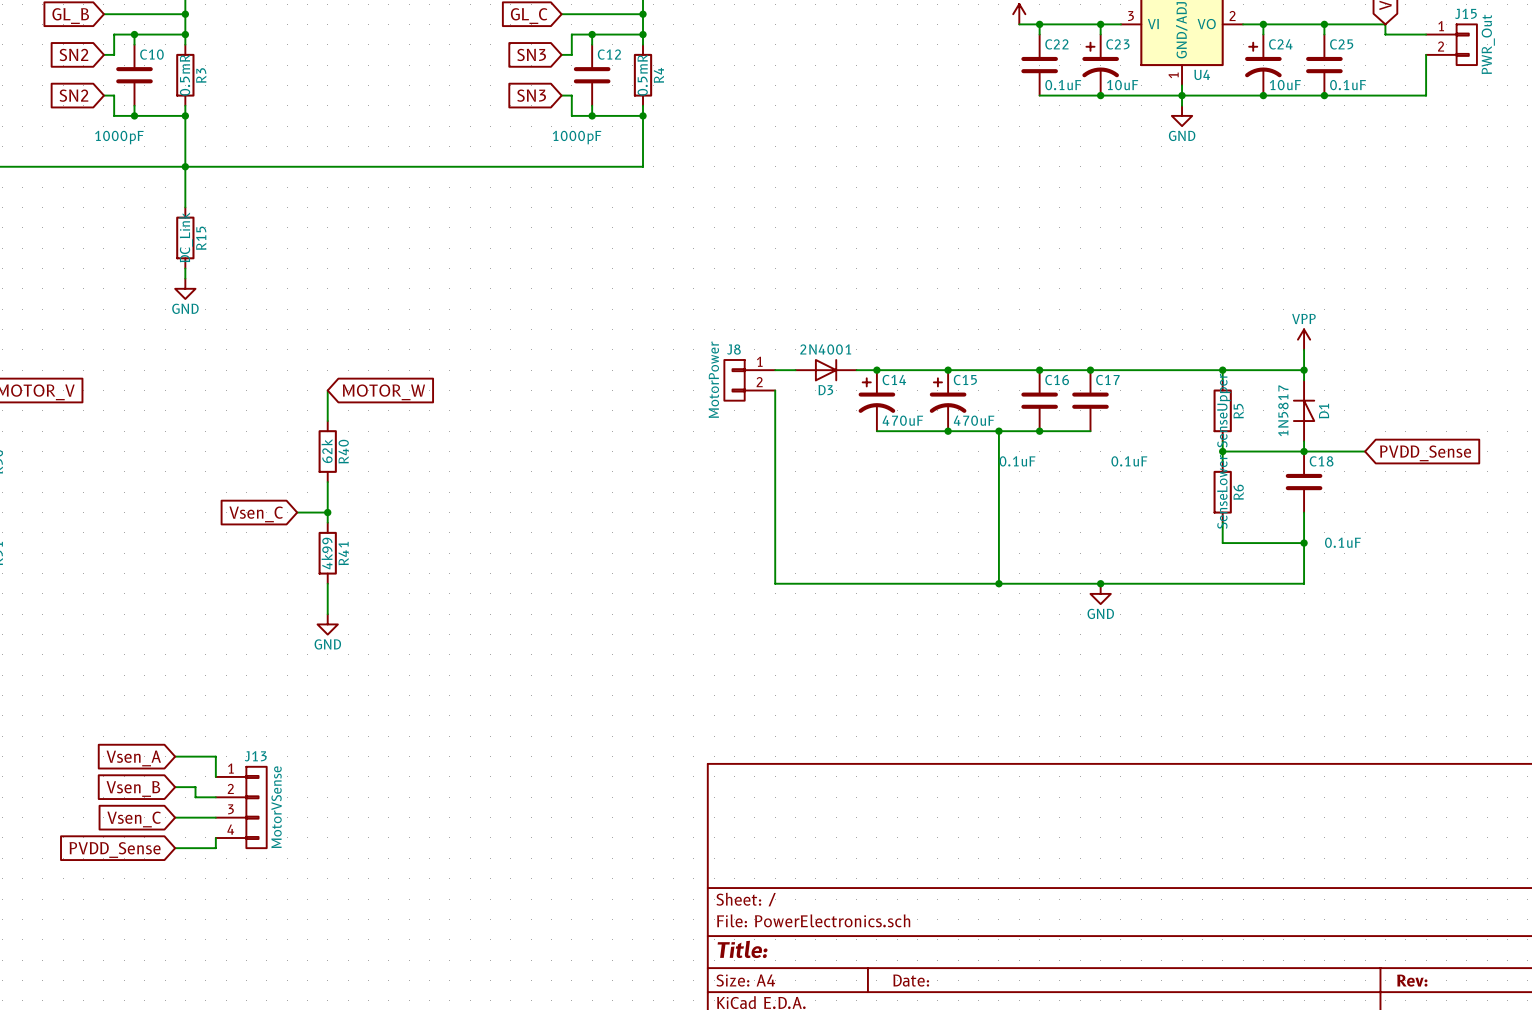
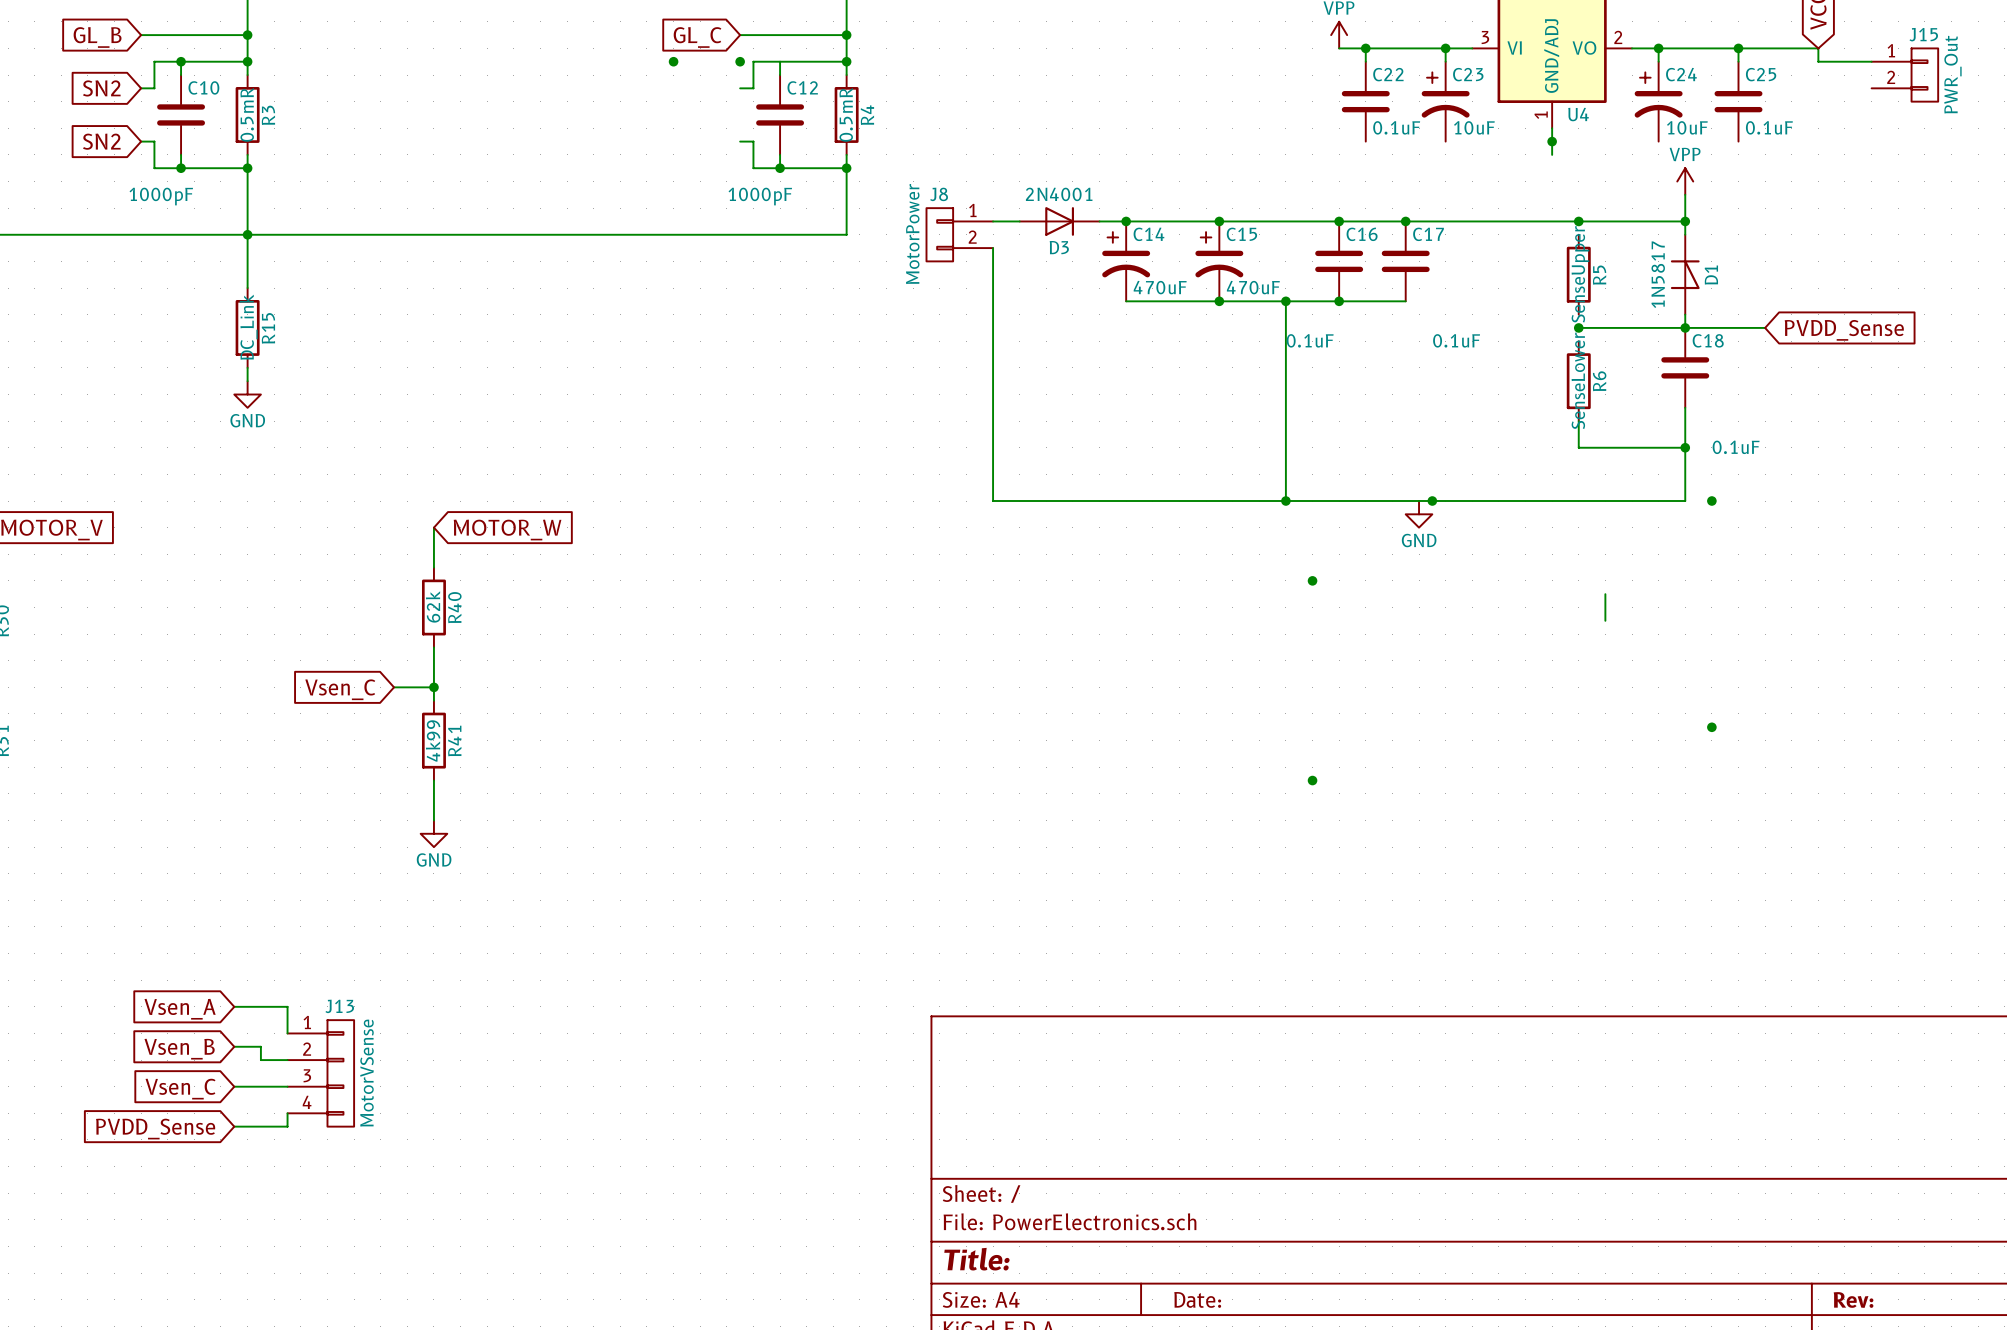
junction: none -> (673, 61)
junction position: (592, 34) -> (740, 61)
global label: SN3 (531, 54) -> none
wire: (1426, 54) (1426, 95) (1039, 95) -> none
global label: SN3 (531, 95) -> none
junction: (1100, 95) -> none
junction: (1263, 95) -> none
junction: (1324, 95) -> none
power symbol: GND (1182, 115) -> none
power symbol: none -> VPP (1685, 181)
wire: none -> (1685, 194) (1685, 234)
wire: none -> (993, 221) (1019, 221)
wire: none -> (1099, 221) (1685, 221)
junction: none -> (1126, 221)
junction: none -> (1219, 221)
junction: none -> (1339, 221)
junction: none -> (1405, 221)
junction: none -> (1578, 221)
junction: none -> (1685, 221)
wire: none -> (993, 248) (993, 501) (1019, 501)
wire: none -> (1126, 301) (1405, 301)
junction: none -> (1219, 301)
wire: none -> (1285, 301) (1285, 501)
junction: none -> (1285, 301)
junction: none -> (1339, 301)
wire: none -> (1578, 327) (1765, 327)
junction: none -> (1578, 327)
junction: none -> (1685, 327)
global label: none -> PVDD_Sense (1844, 330)
wire: none -> (1578, 421) (1578, 447) (1685, 447)
junction: none -> (1685, 447)
power symbol: VPP (1304, 339) -> none
wire: (1304, 349) (1304, 380) -> none
D3 position: (826, 370) -> (1059, 221)
junction: (876, 370) -> none
junction: (948, 370) -> none
junction: none -> (1285, 501)
junction: (1039, 370) -> none
wire: (1222, 370) (1222, 380) -> (1685, 314) (1685, 327)
junction: (1222, 370) -> none
wire: (1283, 370) (1304, 370) -> (1685, 501) (1685, 407)
J8 position: (749, 380) -> (959, 234)
power symbol: none -> GND (1419, 514)
wire: (775, 390) (775, 583) (1304, 583) (1304, 512) -> none
C14 position: (876, 400) -> (1126, 261)
C15 position: (948, 400) -> (1219, 261)
C16 position: (1039, 400) -> (1339, 261)
C17 position: (1090, 400) -> (1405, 261)
R5 position: (1222, 410) -> (1578, 274)
D1 position: (1304, 410) -> (1685, 274)
wire: (876, 431) (1090, 431) -> none
junction: (948, 431) -> none
wire: (998, 431) (998, 583) -> none
junction: (1039, 431) -> none
wire: (1304, 441) (1304, 451) -> none
wire: (1222, 451) (1365, 451) -> none
junction: (1222, 451) -> none
junction: (1304, 451) -> none
global label: PVDD_Sense (1425, 453) -> none
C18 position: (1304, 482) -> (1685, 367)
R6 position: (1222, 492) -> (1578, 381)
wire: (1222, 522) (1222, 543) (1304, 543) -> none
junction: (1100, 583) -> none
power symbol: GND (1100, 593) -> none

